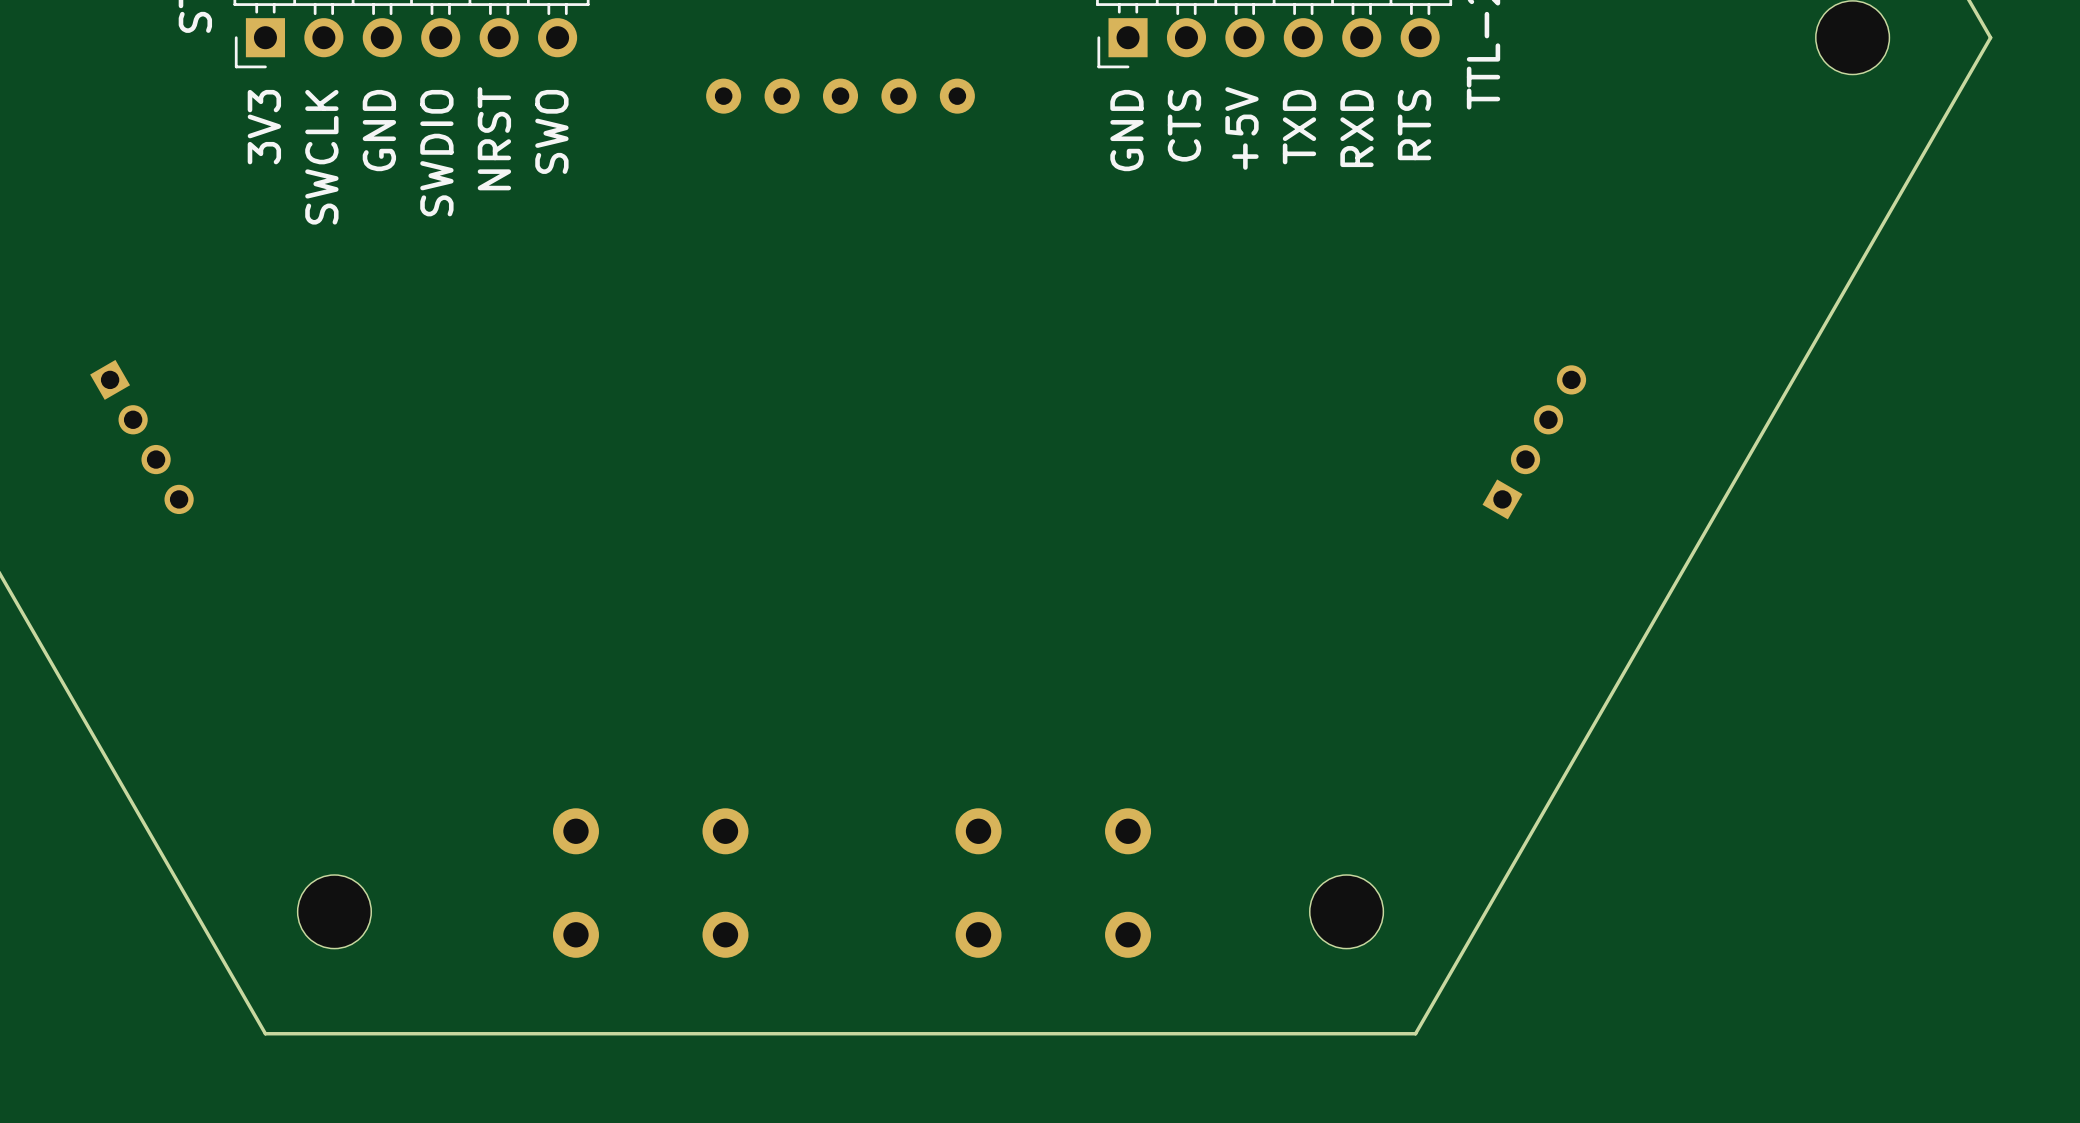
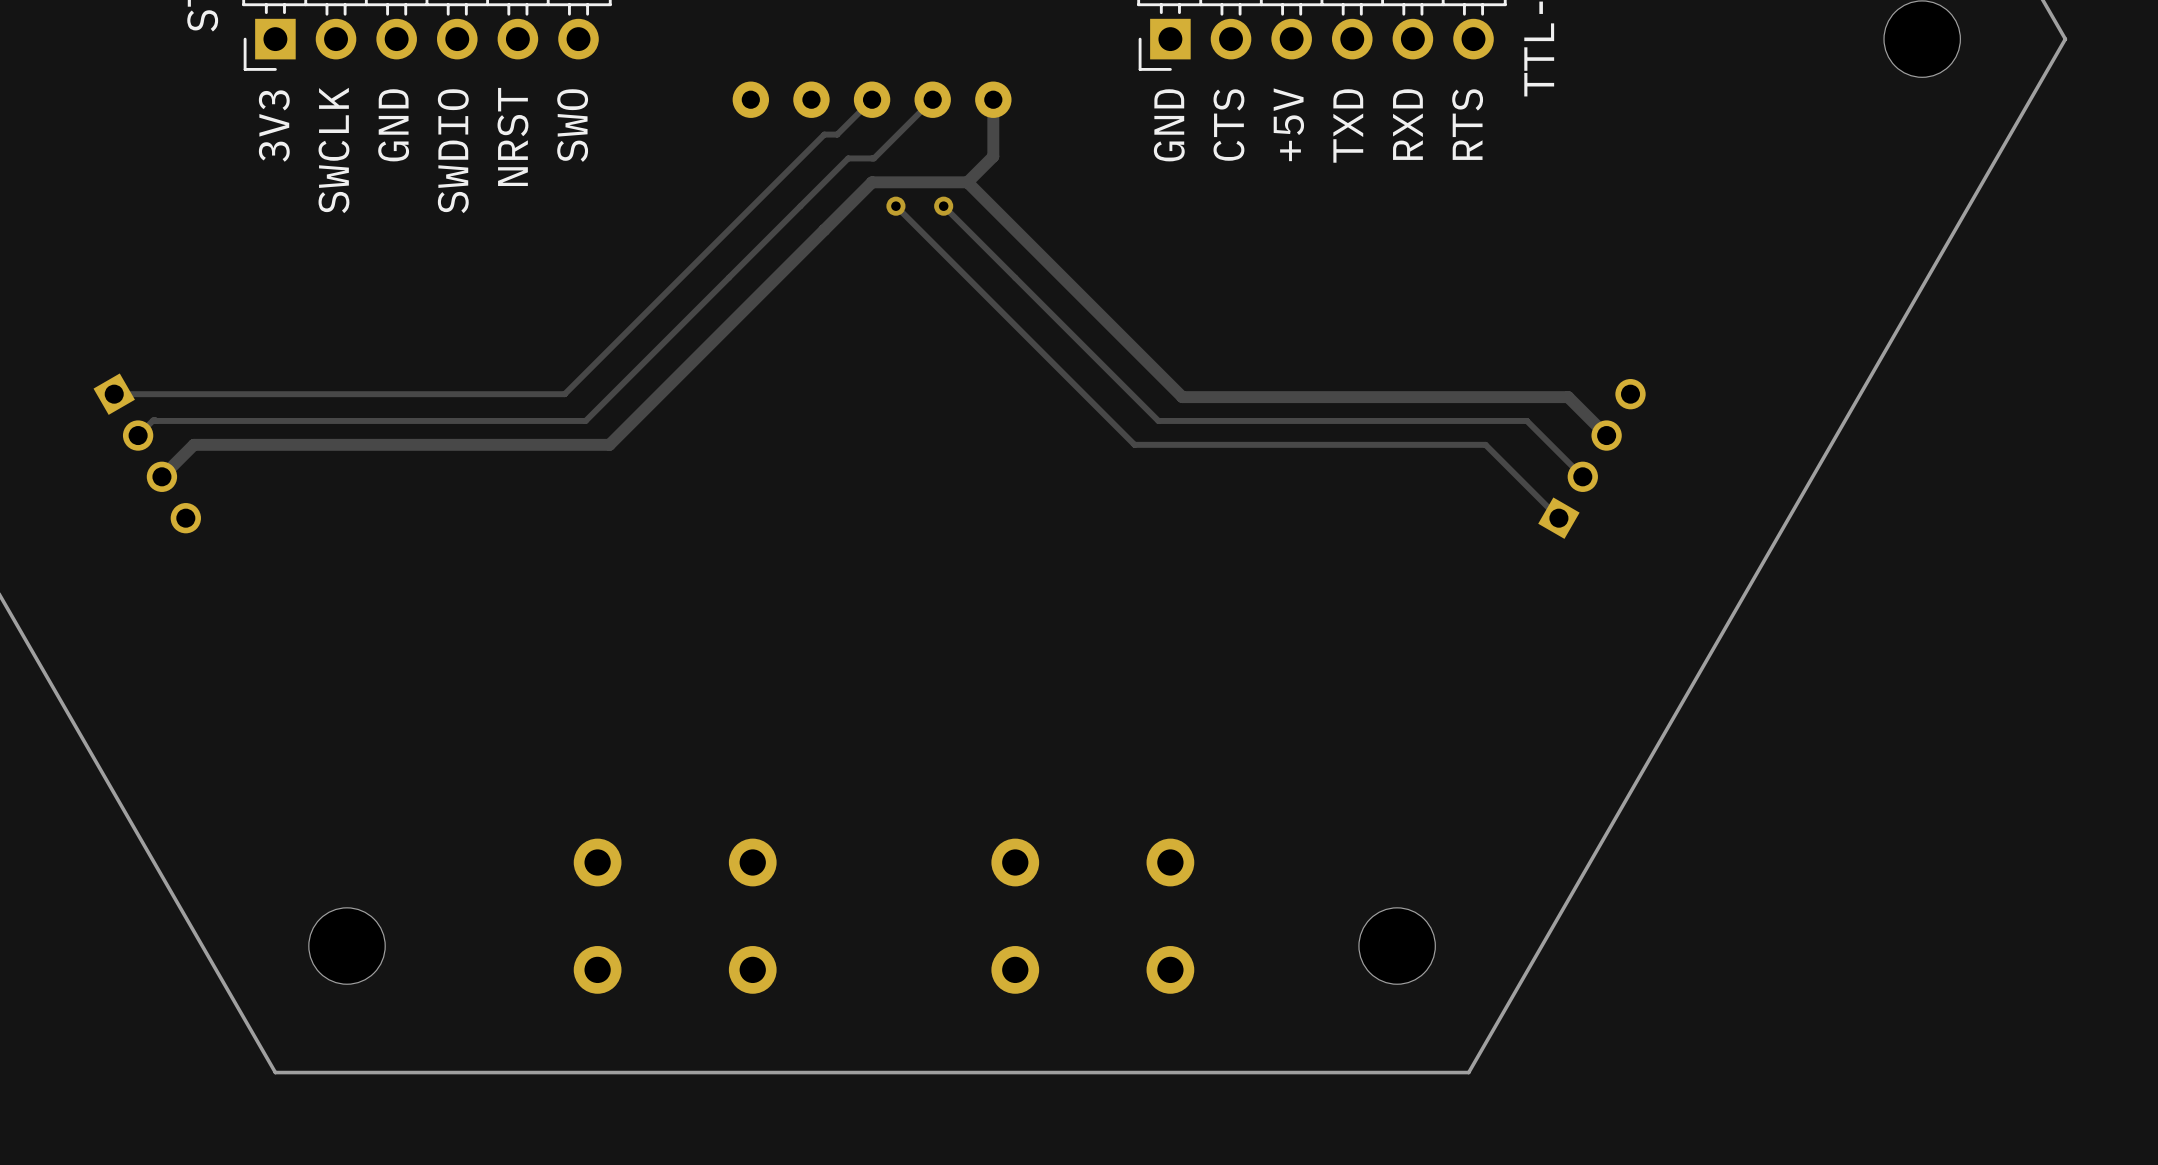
track: none -> (872, 99) (837, 134) (824, 134) (564, 394) (114, 394)
track: none -> (932, 99) (873, 158) (848, 158) (585, 420) (153, 420) (138, 435)
track: none -> (993, 99) (993, 156) (967, 182)
track: none -> (967, 182) (872, 182) (609, 444) (193, 444) (161, 476)
track: none -> (967, 182) (1182, 397) (1568, 397) (1606, 435)
track: none -> (895, 206) (1134, 444) (1485, 444) (1558, 518)
via: none -> (895, 206)
track: none -> (943, 206) (1158, 420) (1526, 420) (1582, 476)
via: none -> (943, 206)

